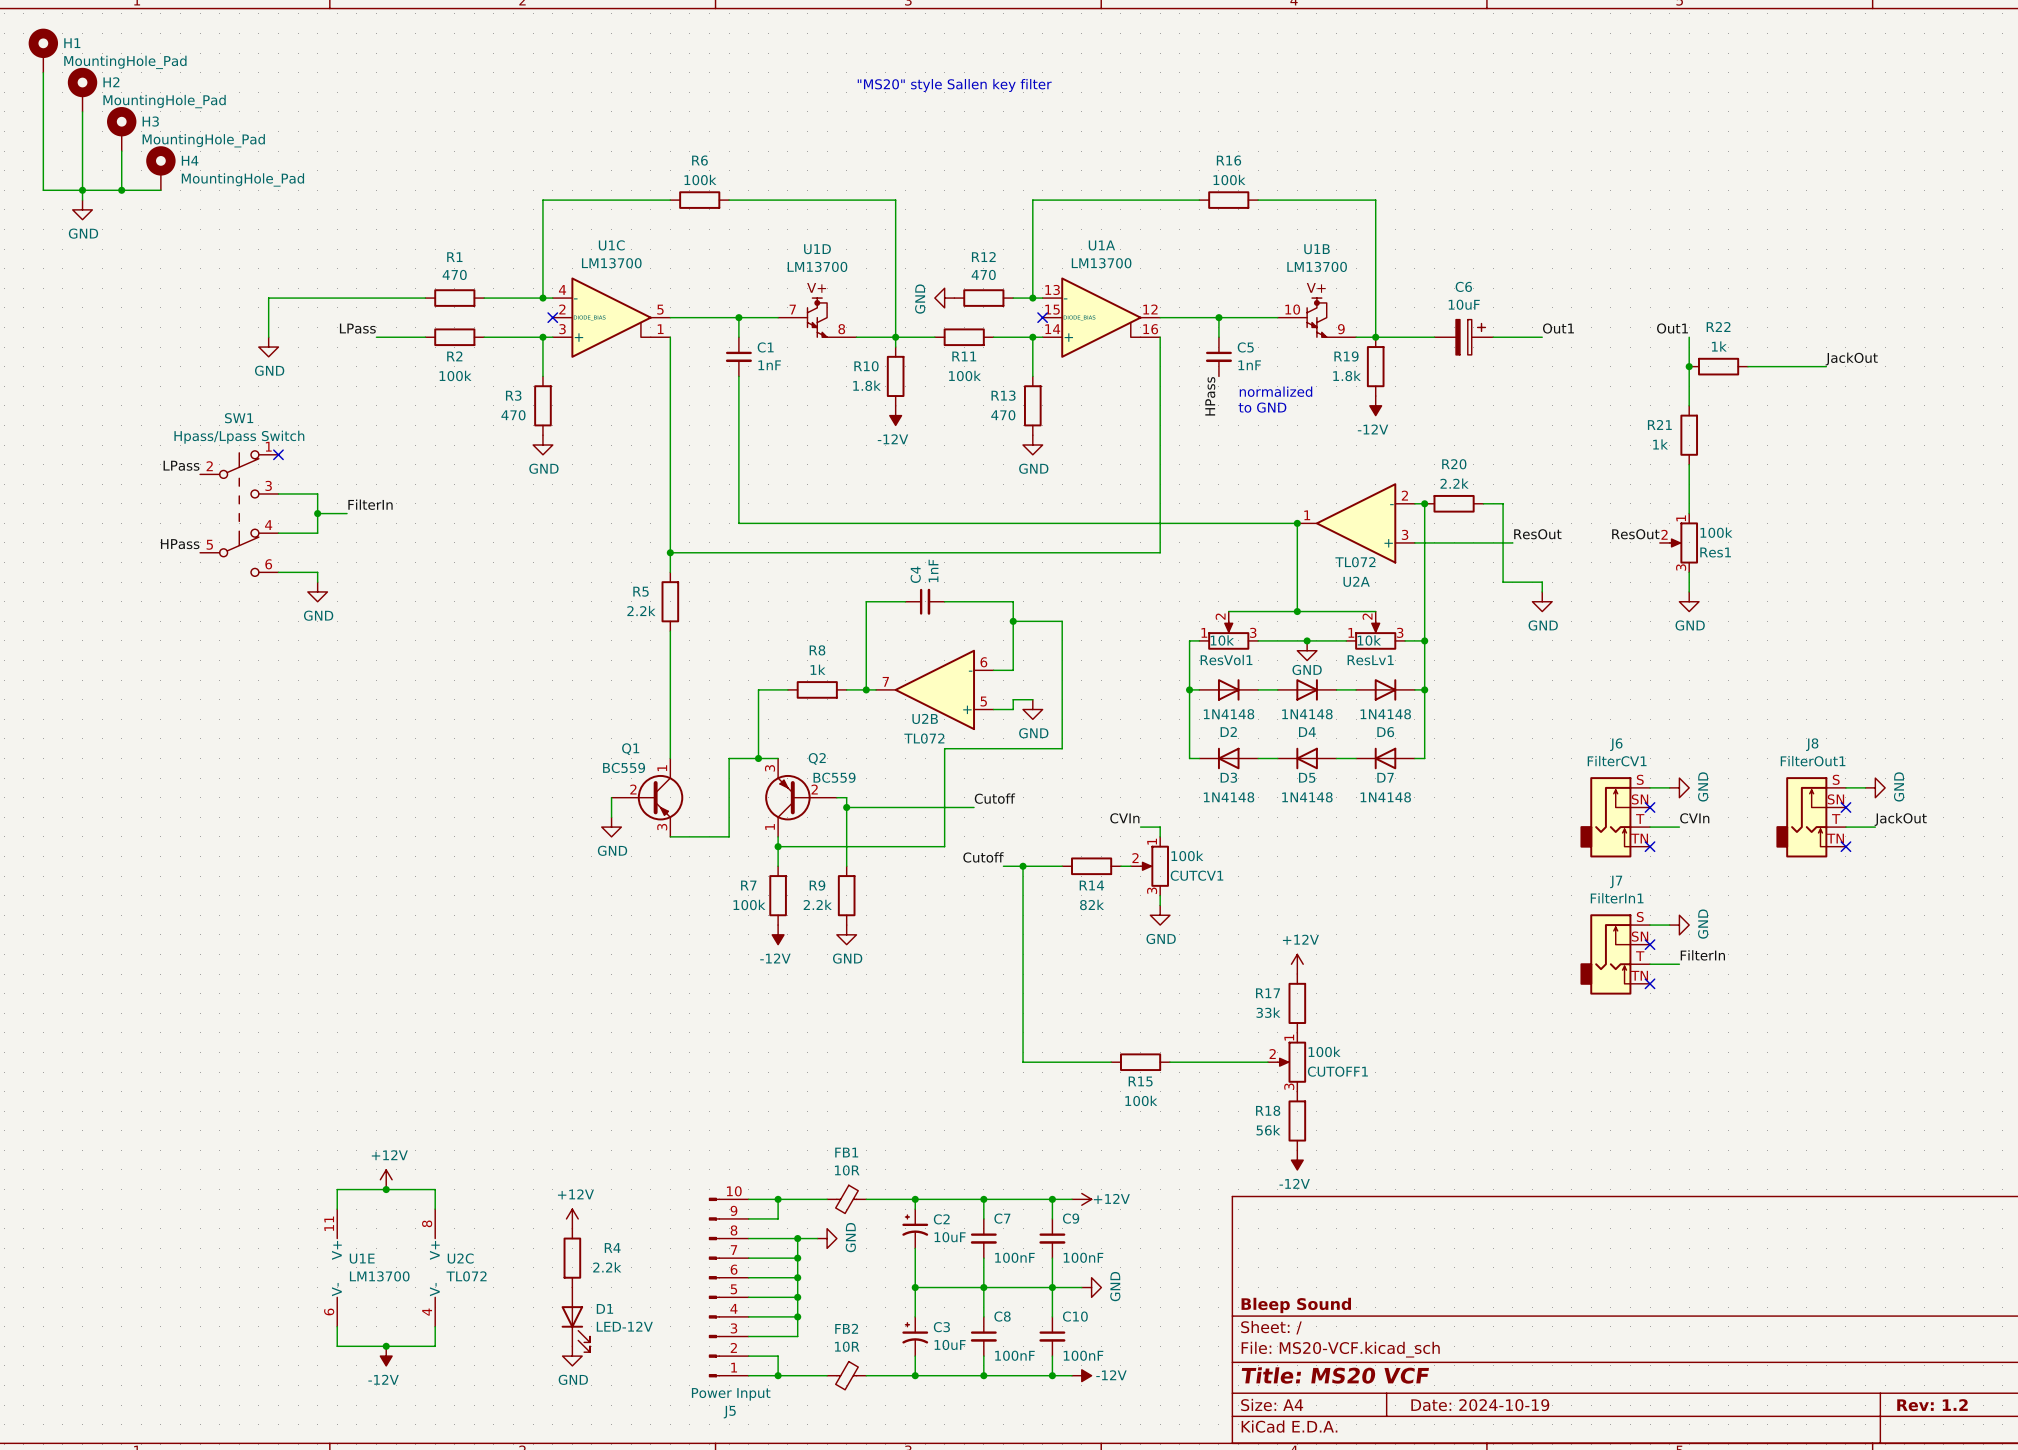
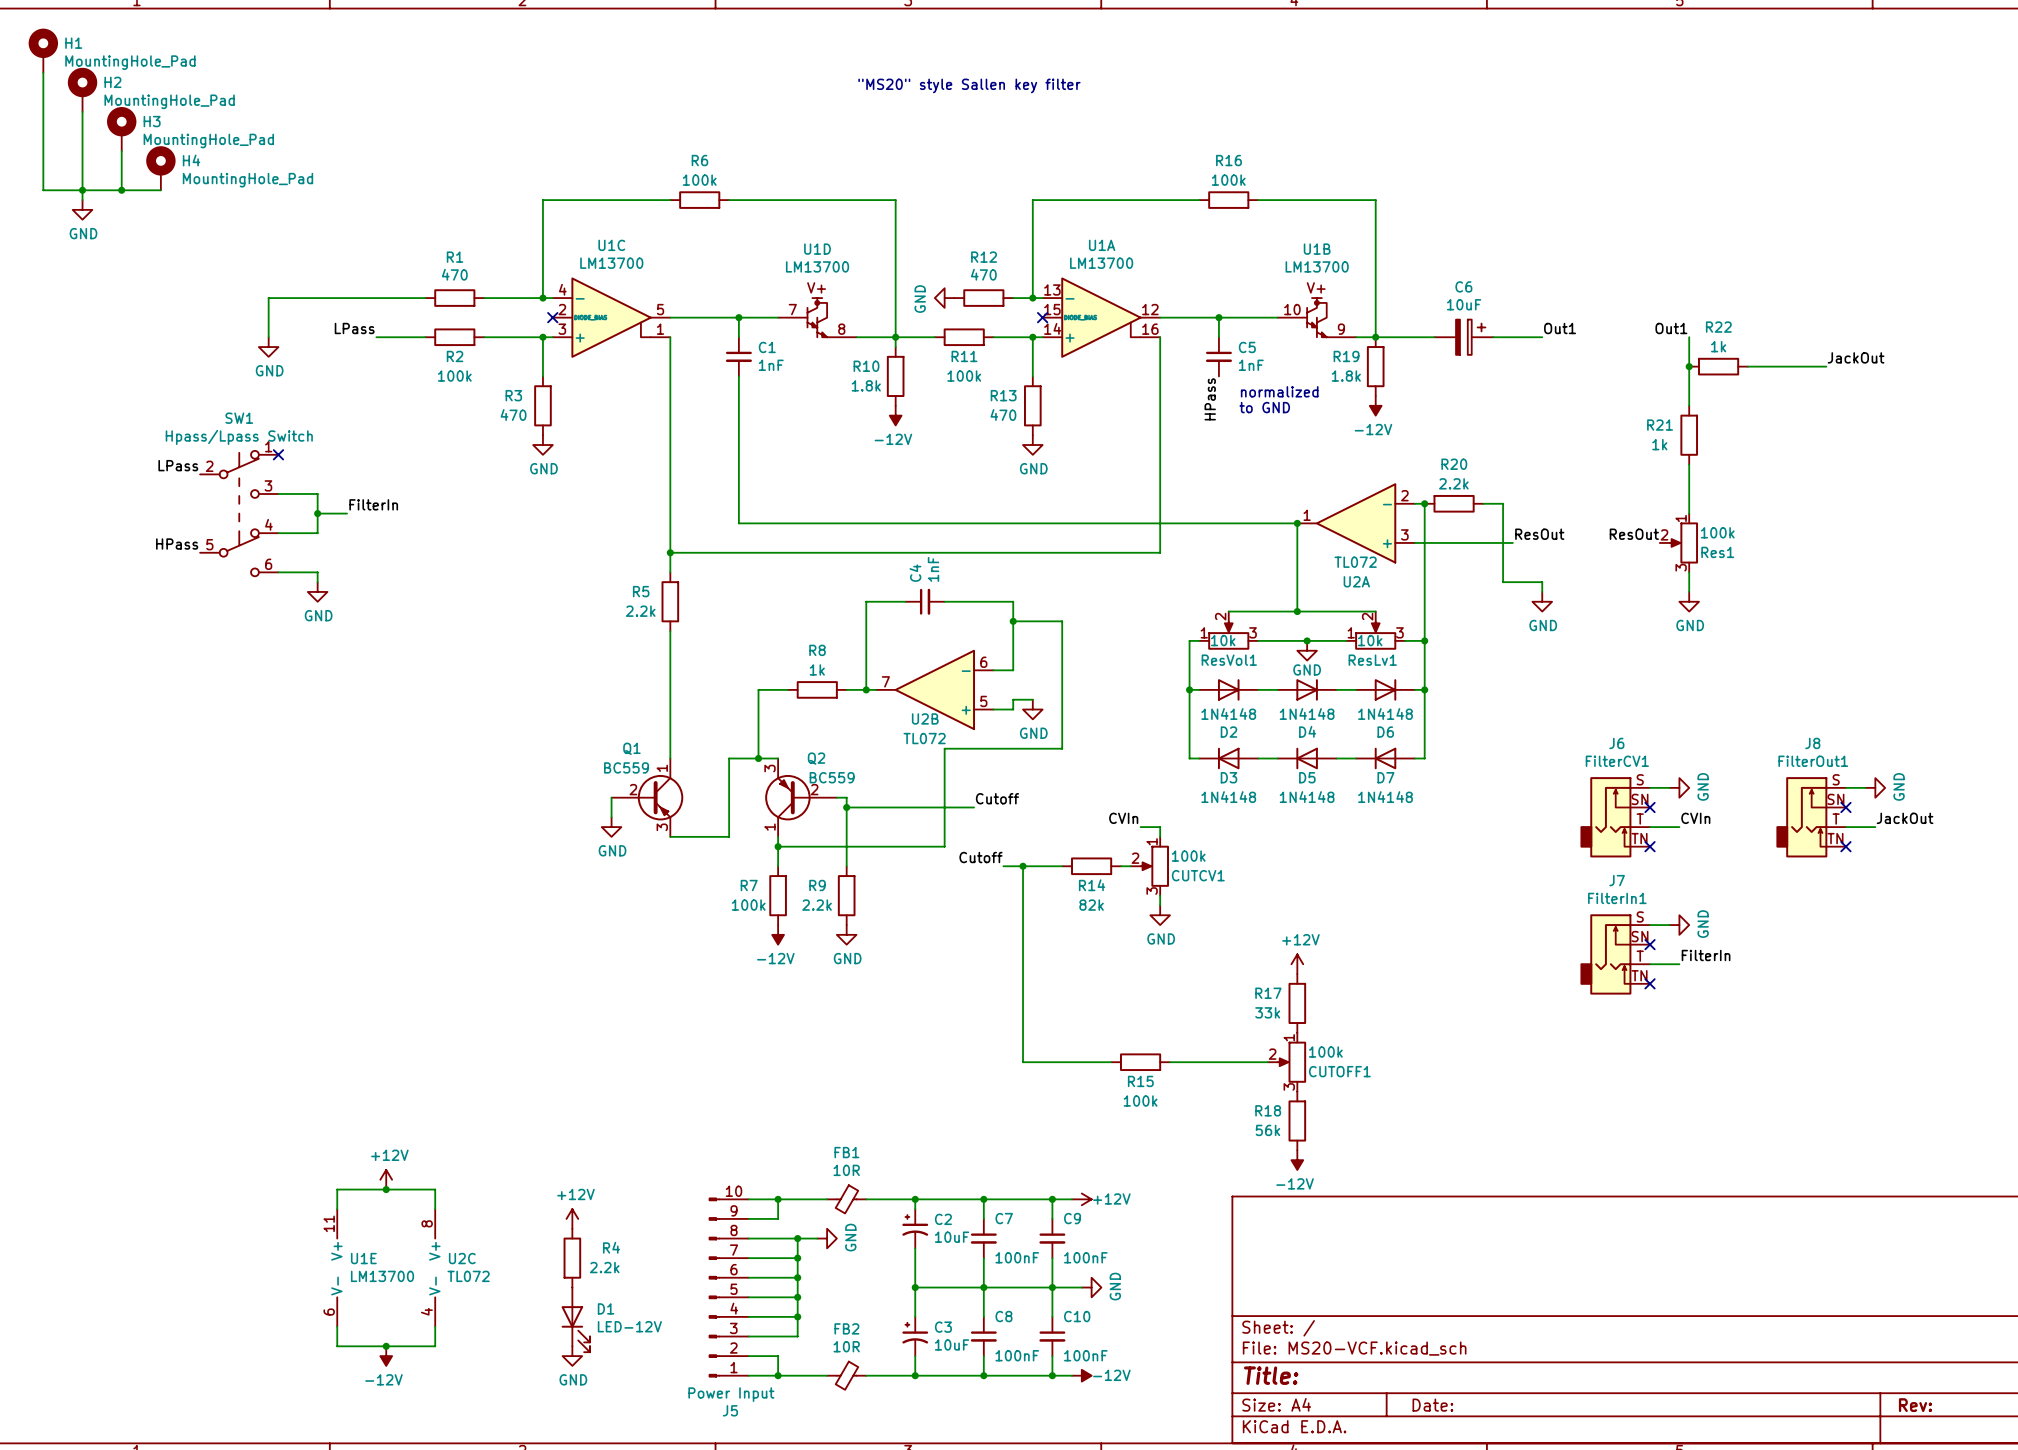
title block: Bleep Sound (1296, 1305) -> none
title block: Title: MS20 VCF (1335, 1375) -> Title: (1271, 1375)
title block: Date: 2024-10-19 (1480, 1405) -> Date: (1432, 1405)
title block: Rev: 1.2 (1932, 1405) -> Rev: (1915, 1405)

